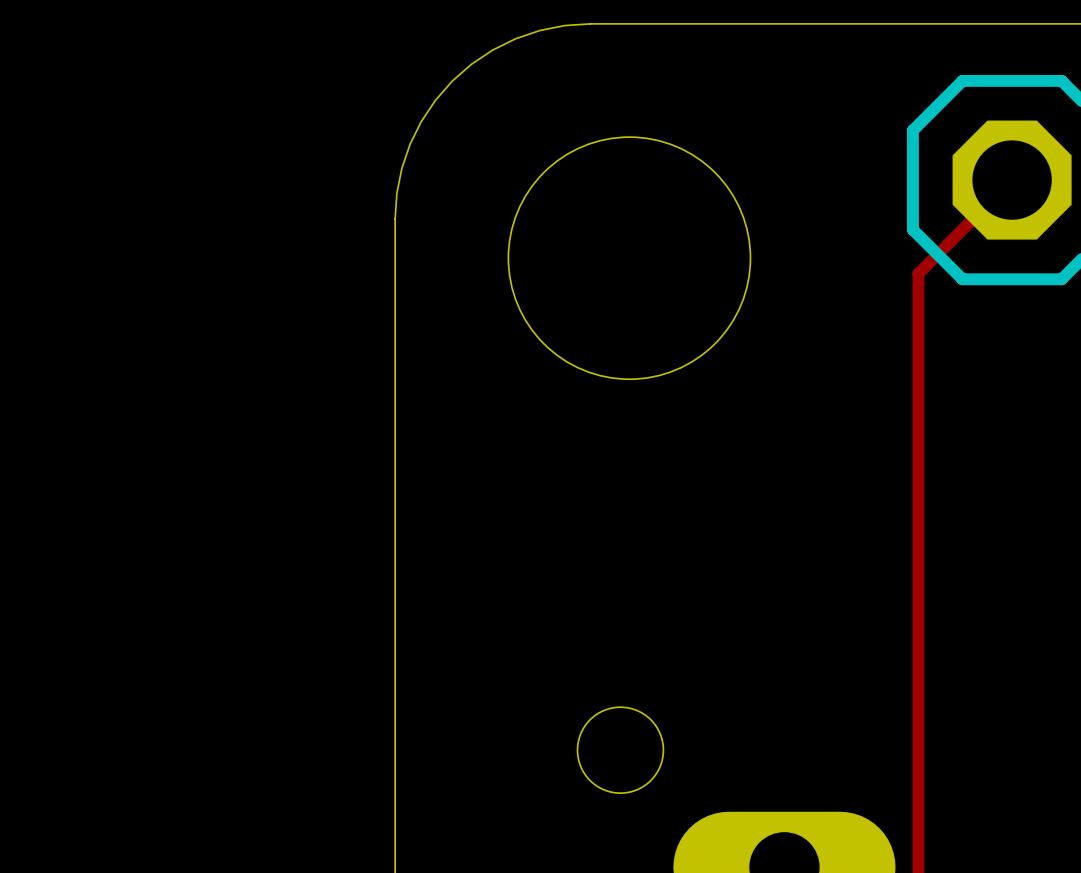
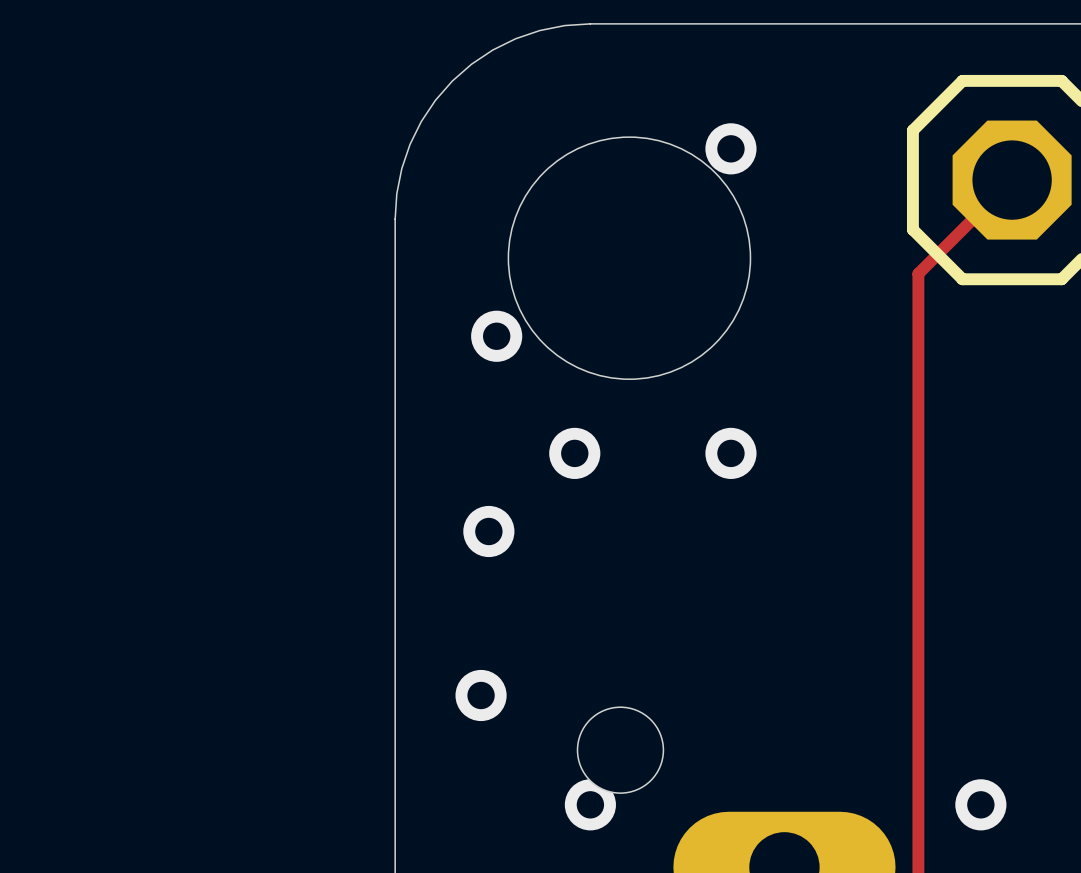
via: none -> (730, 148)
via: none -> (496, 336)
via: none -> (574, 453)
via: none -> (730, 453)
via: none -> (488, 531)
via: none -> (481, 695)
via: none -> (590, 804)
via: none -> (980, 804)

